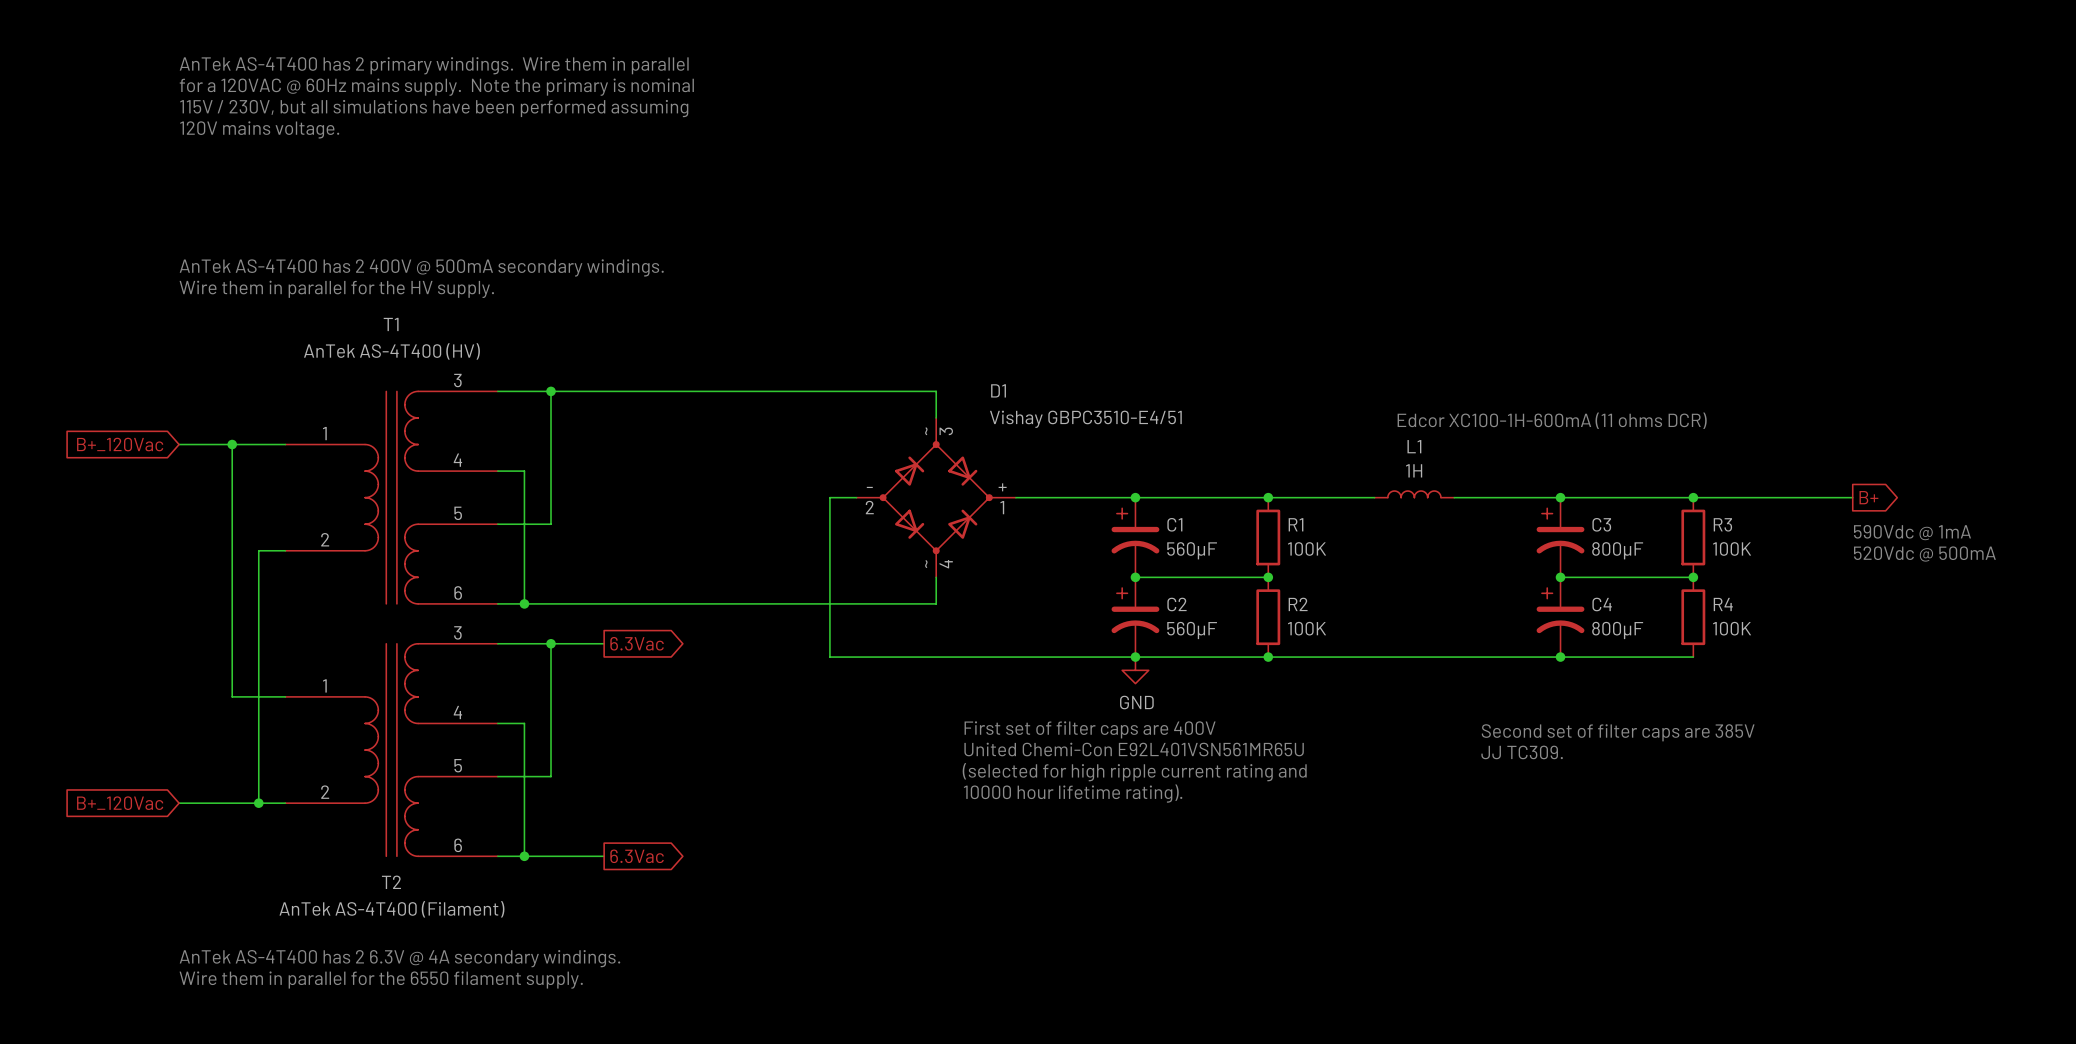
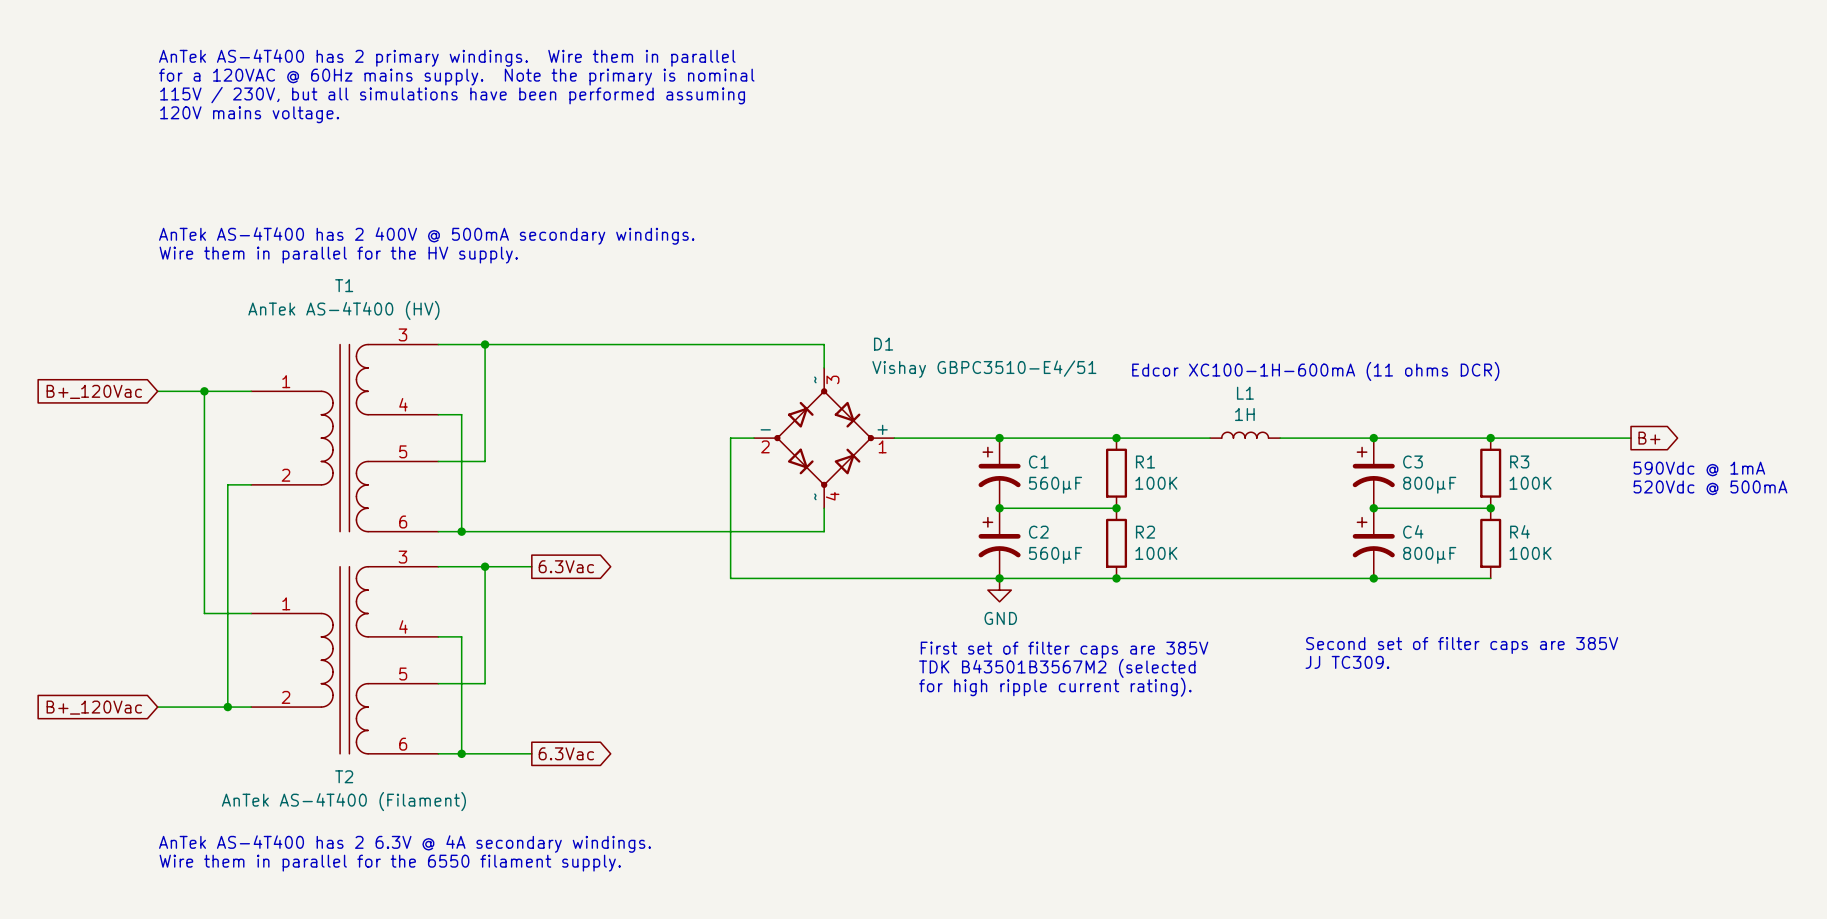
text: First set of filter caps are 400V (1090, 729) -> First set of filter caps are 385V (1064, 650)
text: United Chemi-Con E92L401VSN561MR65U (1134, 749) -> none
text: none -> TDK B43501B3567M2 (selected (1057, 668)
text: (selected for high ripple current rating and (1134, 772) -> for high ripple current rating). (1055, 687)
text: 10000 hour lifetime rating). (1073, 793) -> none

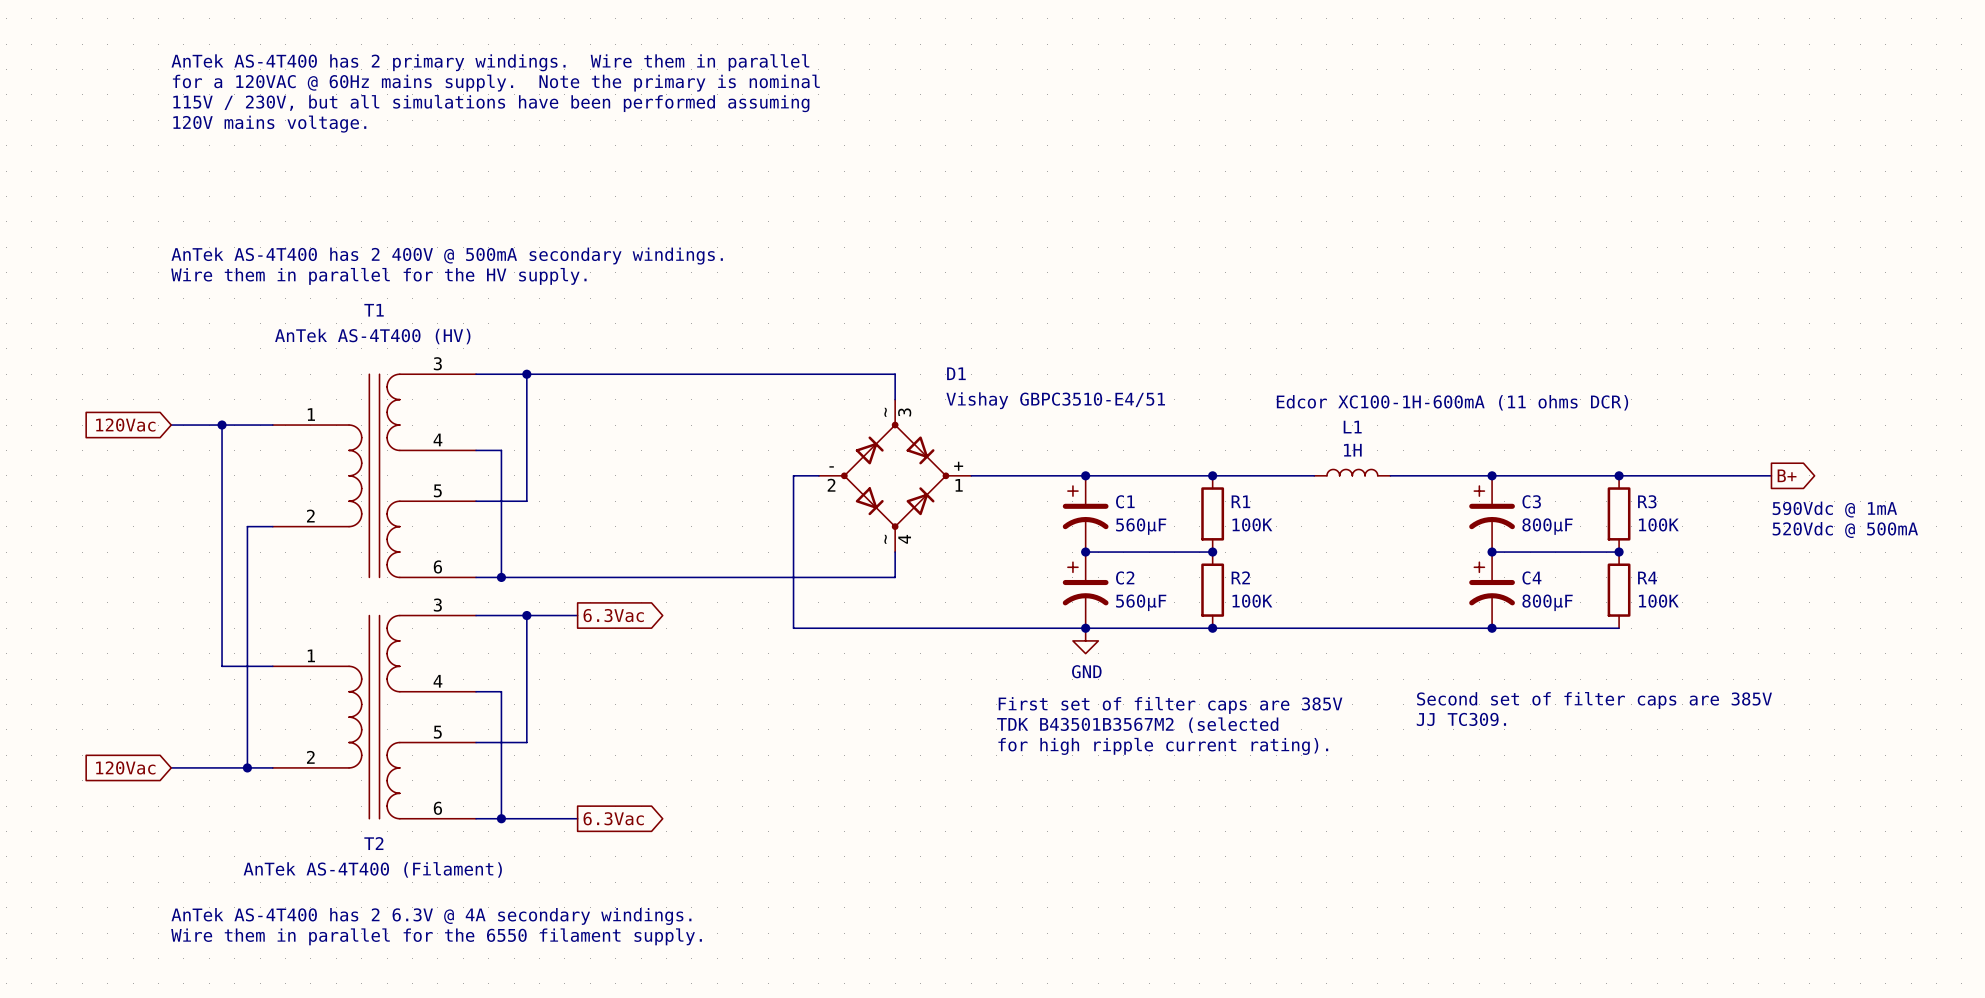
global label: B+_120Vac (94, 391) -> 120Vac (125, 425)
global label: B+_120Vac (94, 707) -> 120Vac (125, 767)

